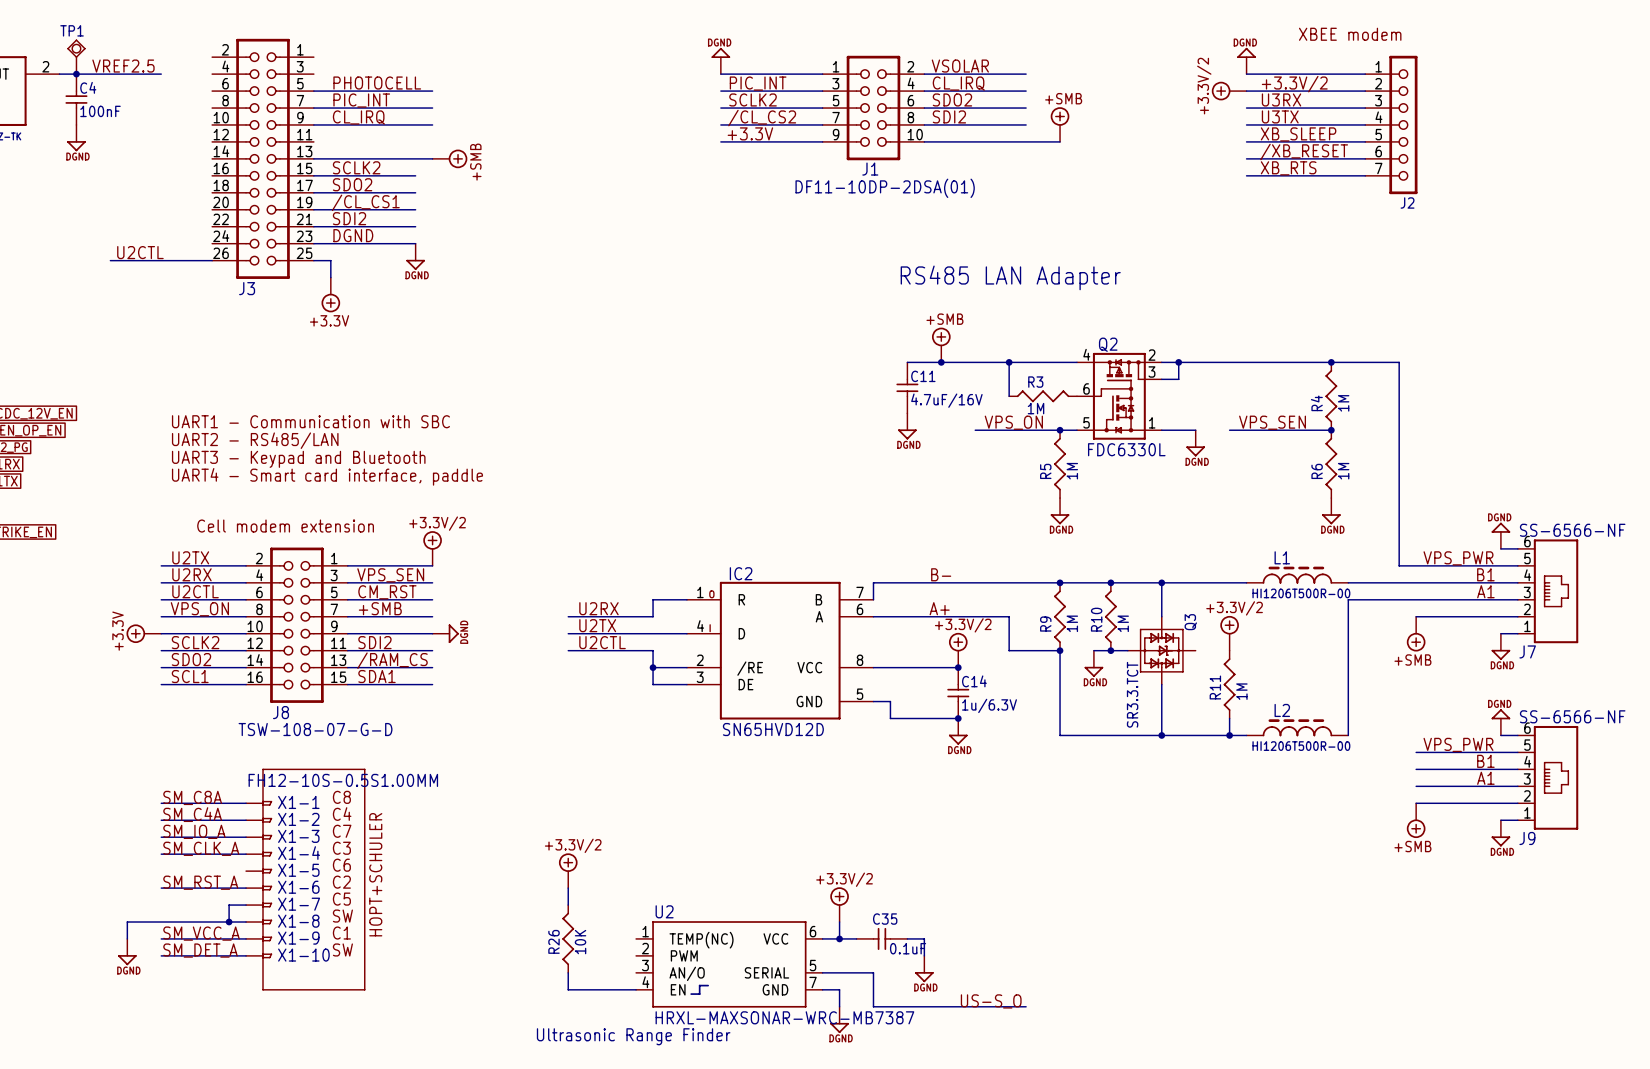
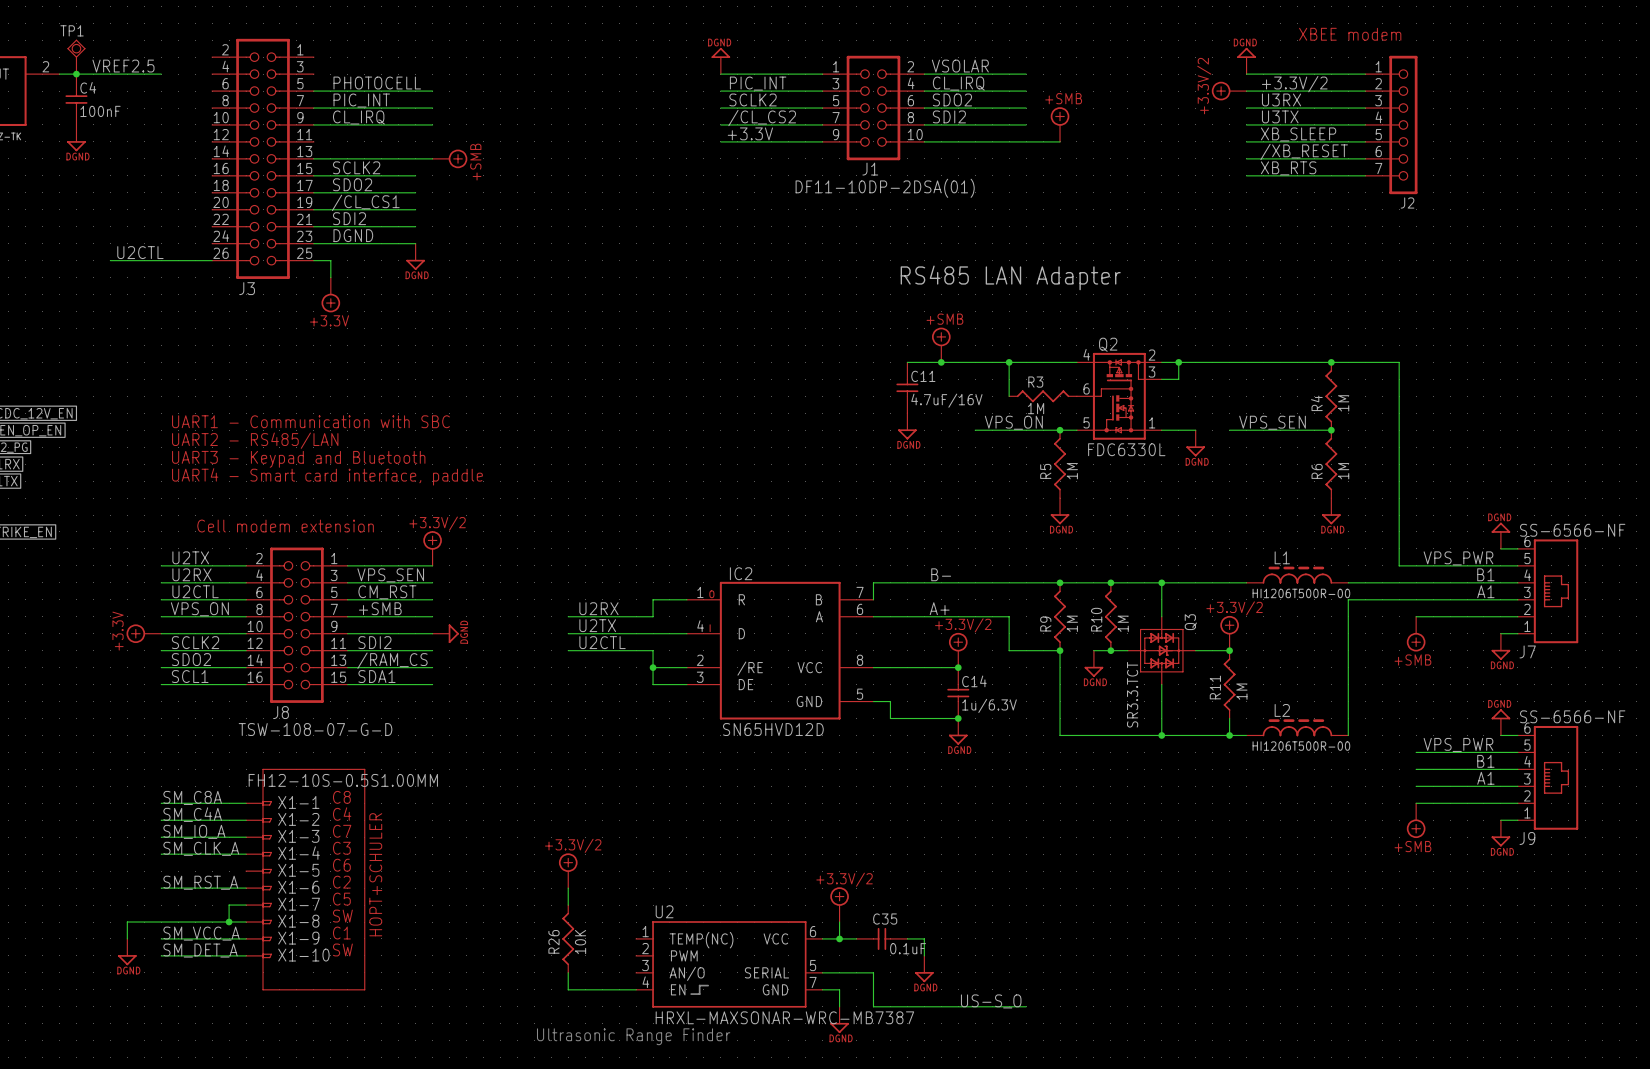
wire: none -> (1195, 650) (1229, 650)
junction: none -> (1229, 650)

